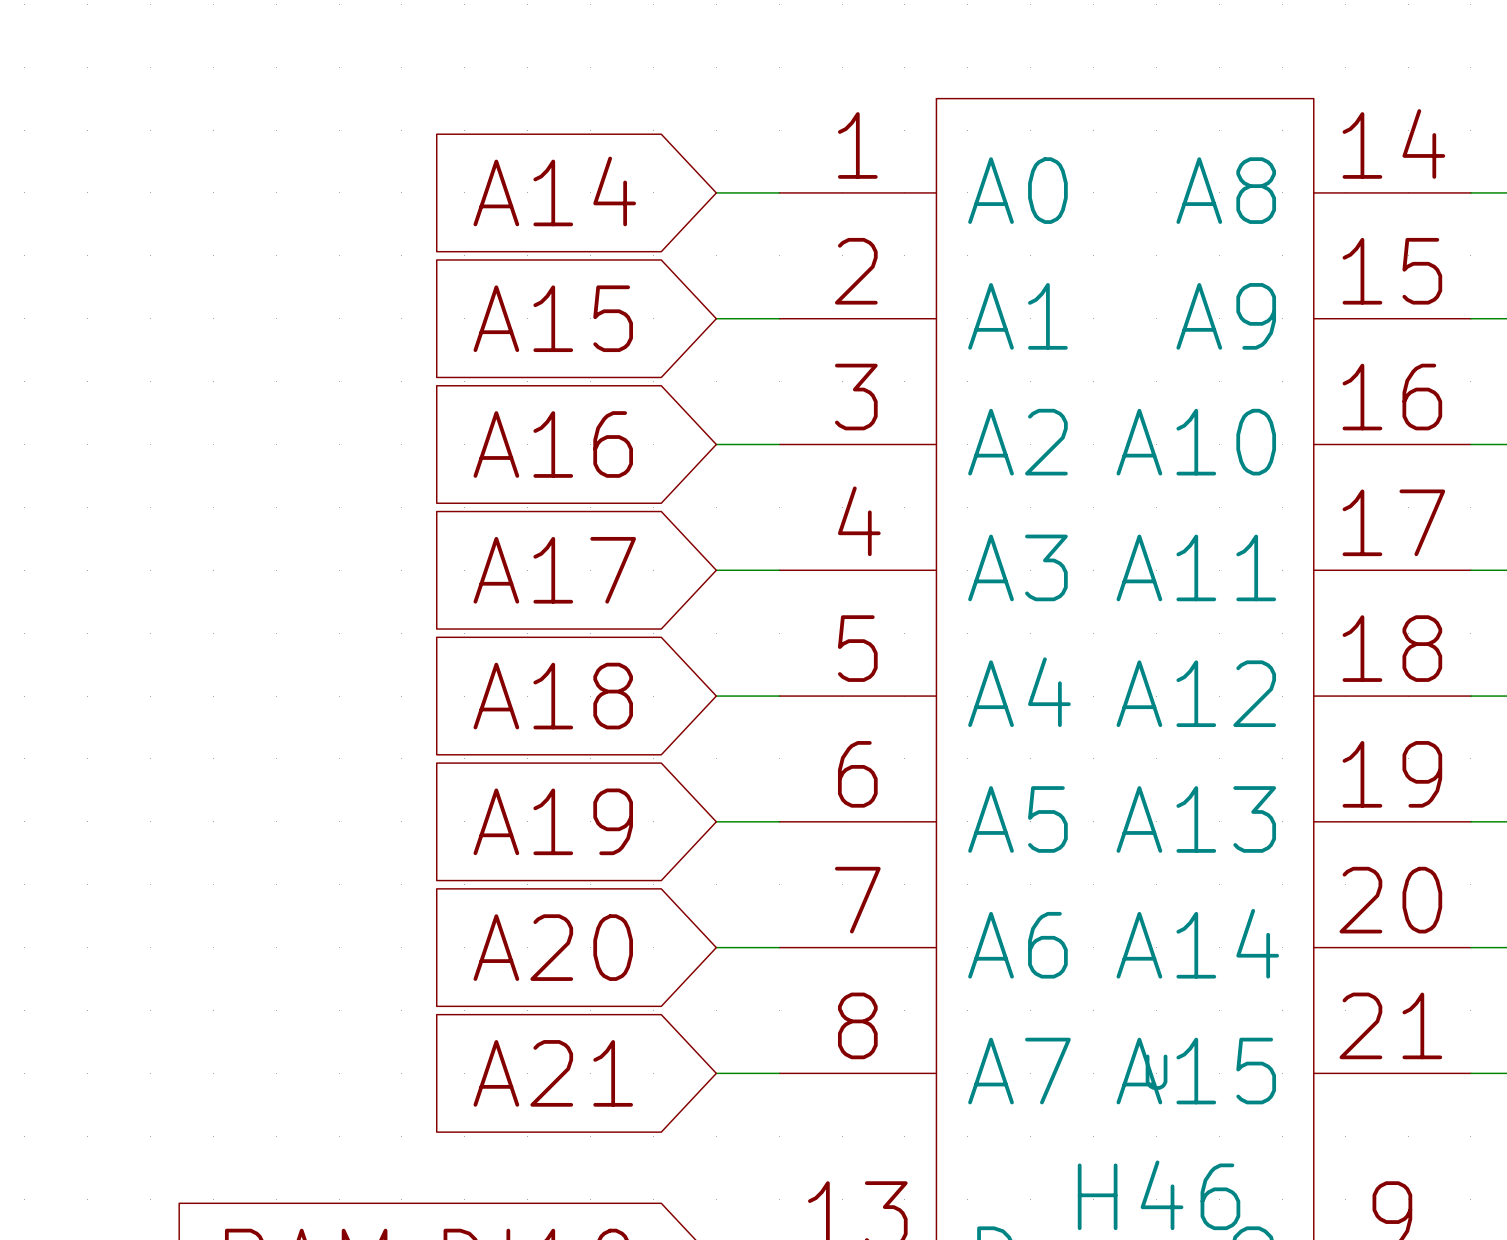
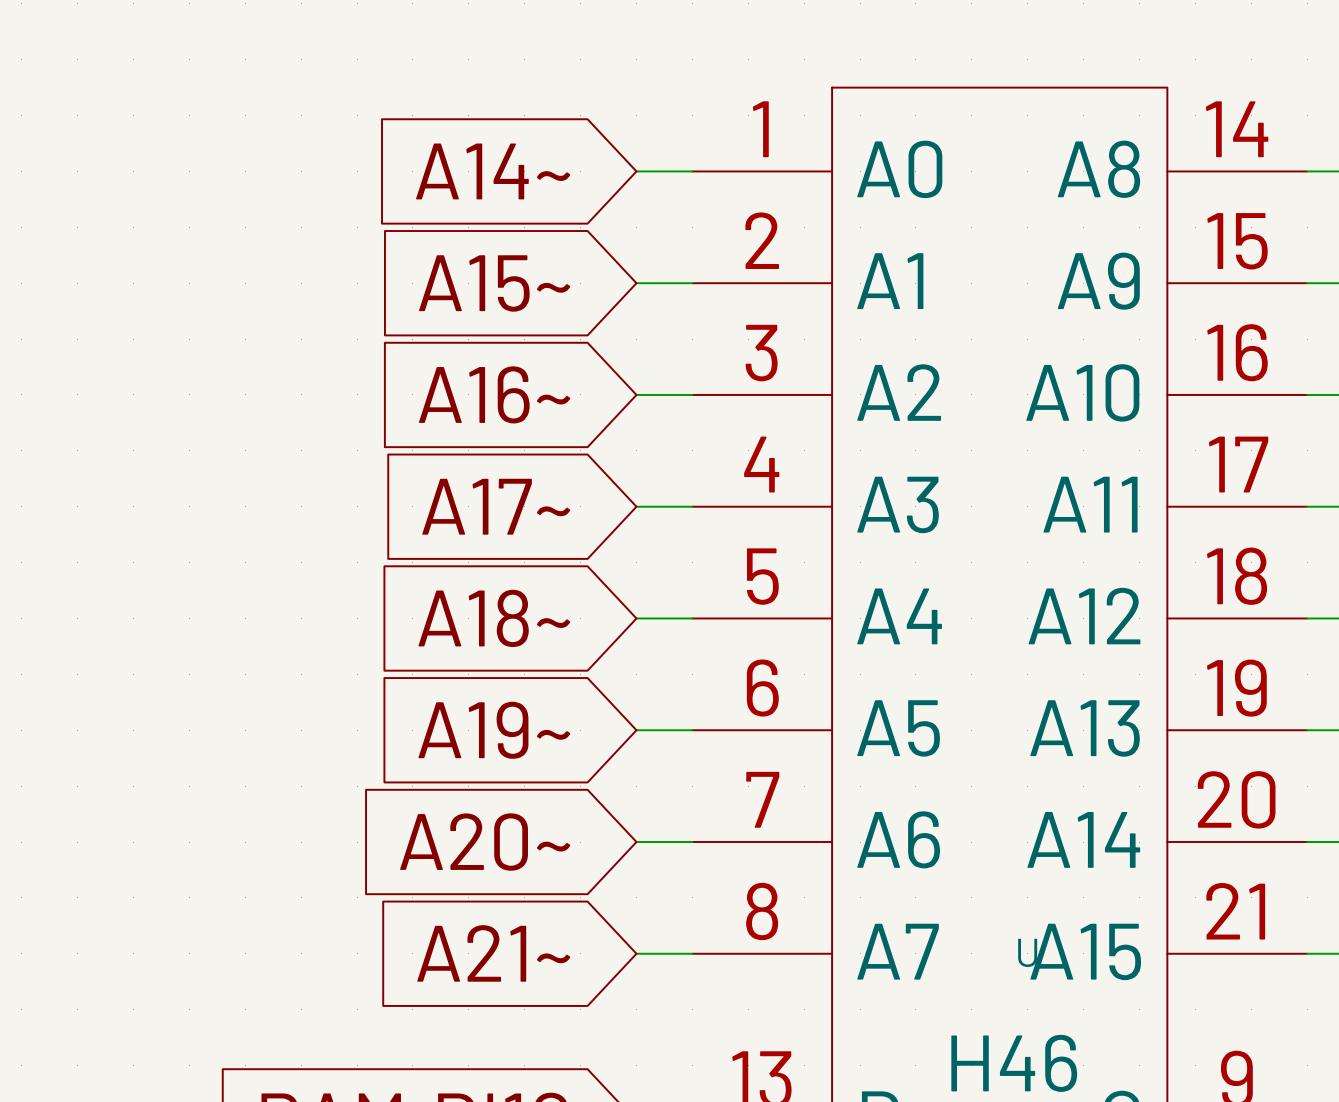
global label: A14 (554, 191) -> A14~ (493, 171)
global label: A15 (553, 318) -> A15~ (494, 283)
global label: A16 (553, 444) -> A16~ (494, 394)
global label: A17 (554, 570) -> A17~ (496, 506)
global label: A18 (553, 696) -> A18~ (494, 618)
global label: A19 (553, 821) -> A19~ (494, 730)
global label: A20 (553, 947) -> A20~ (485, 842)
global label: A21 (553, 1073) -> A21~ (493, 953)

